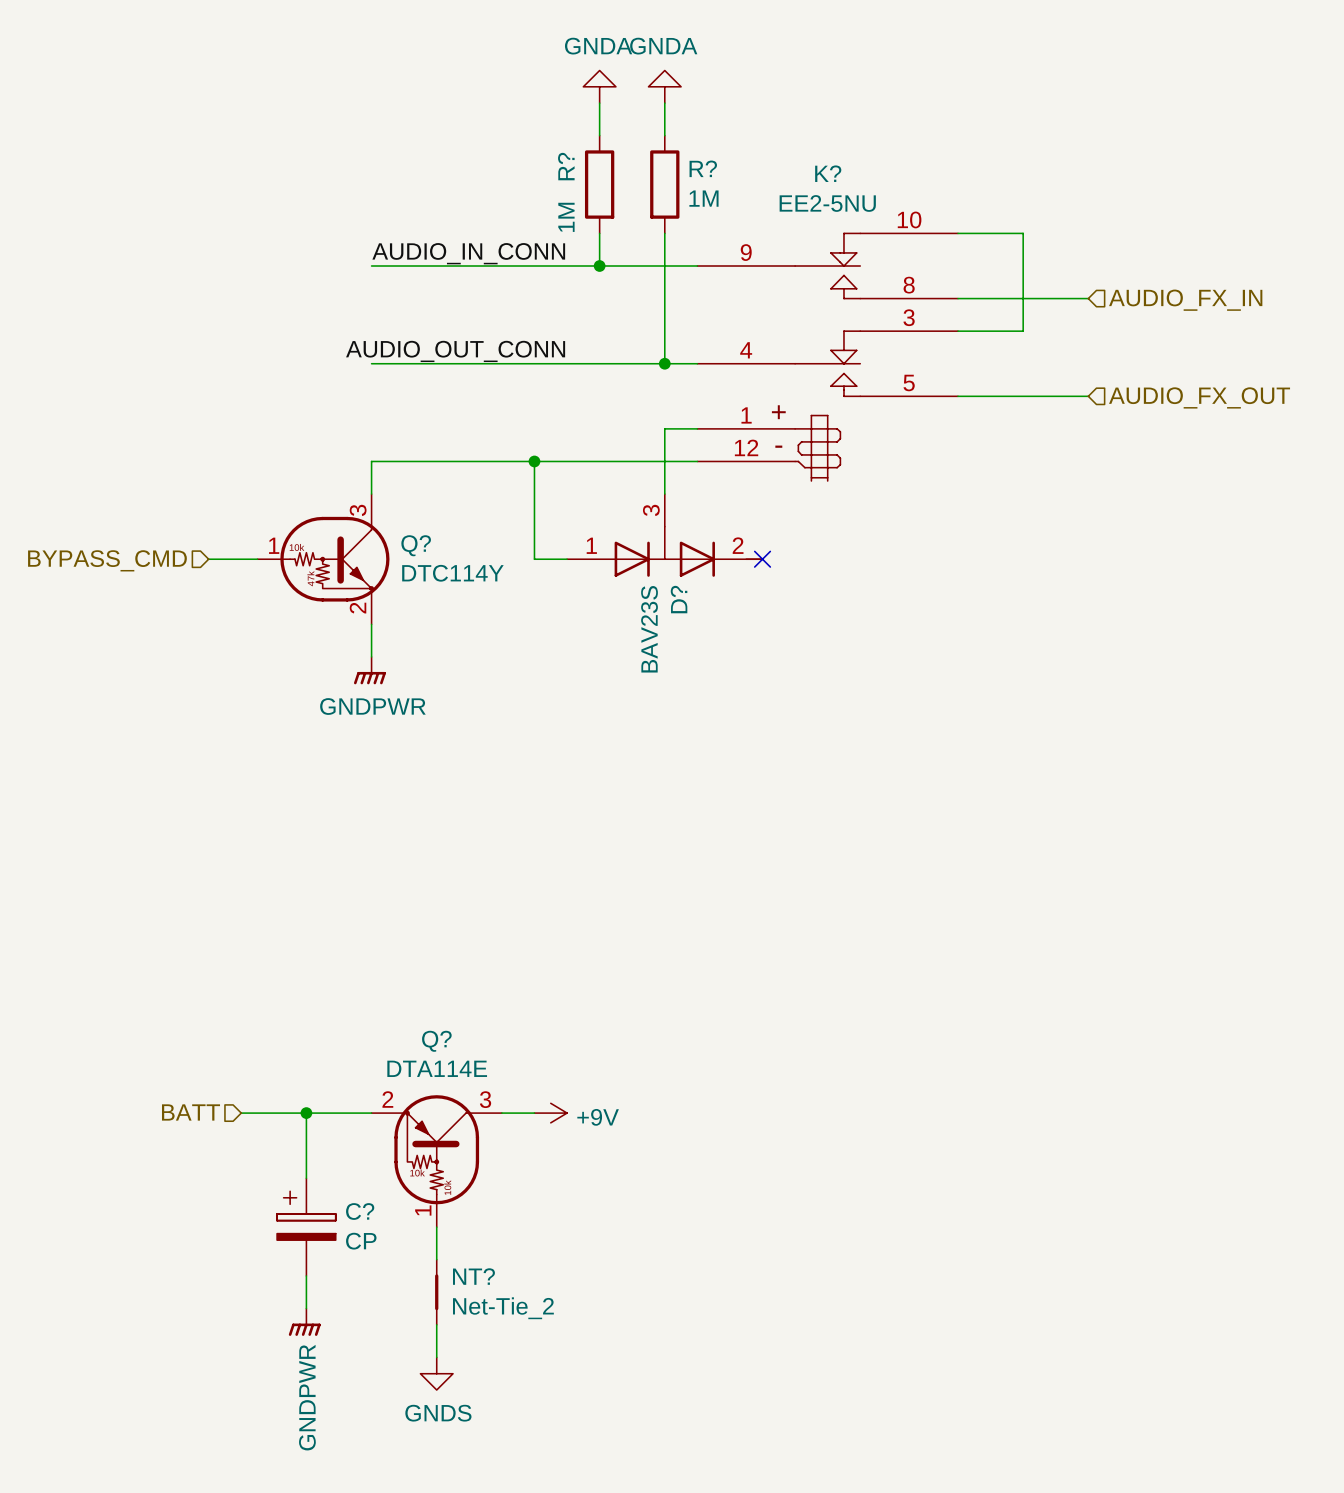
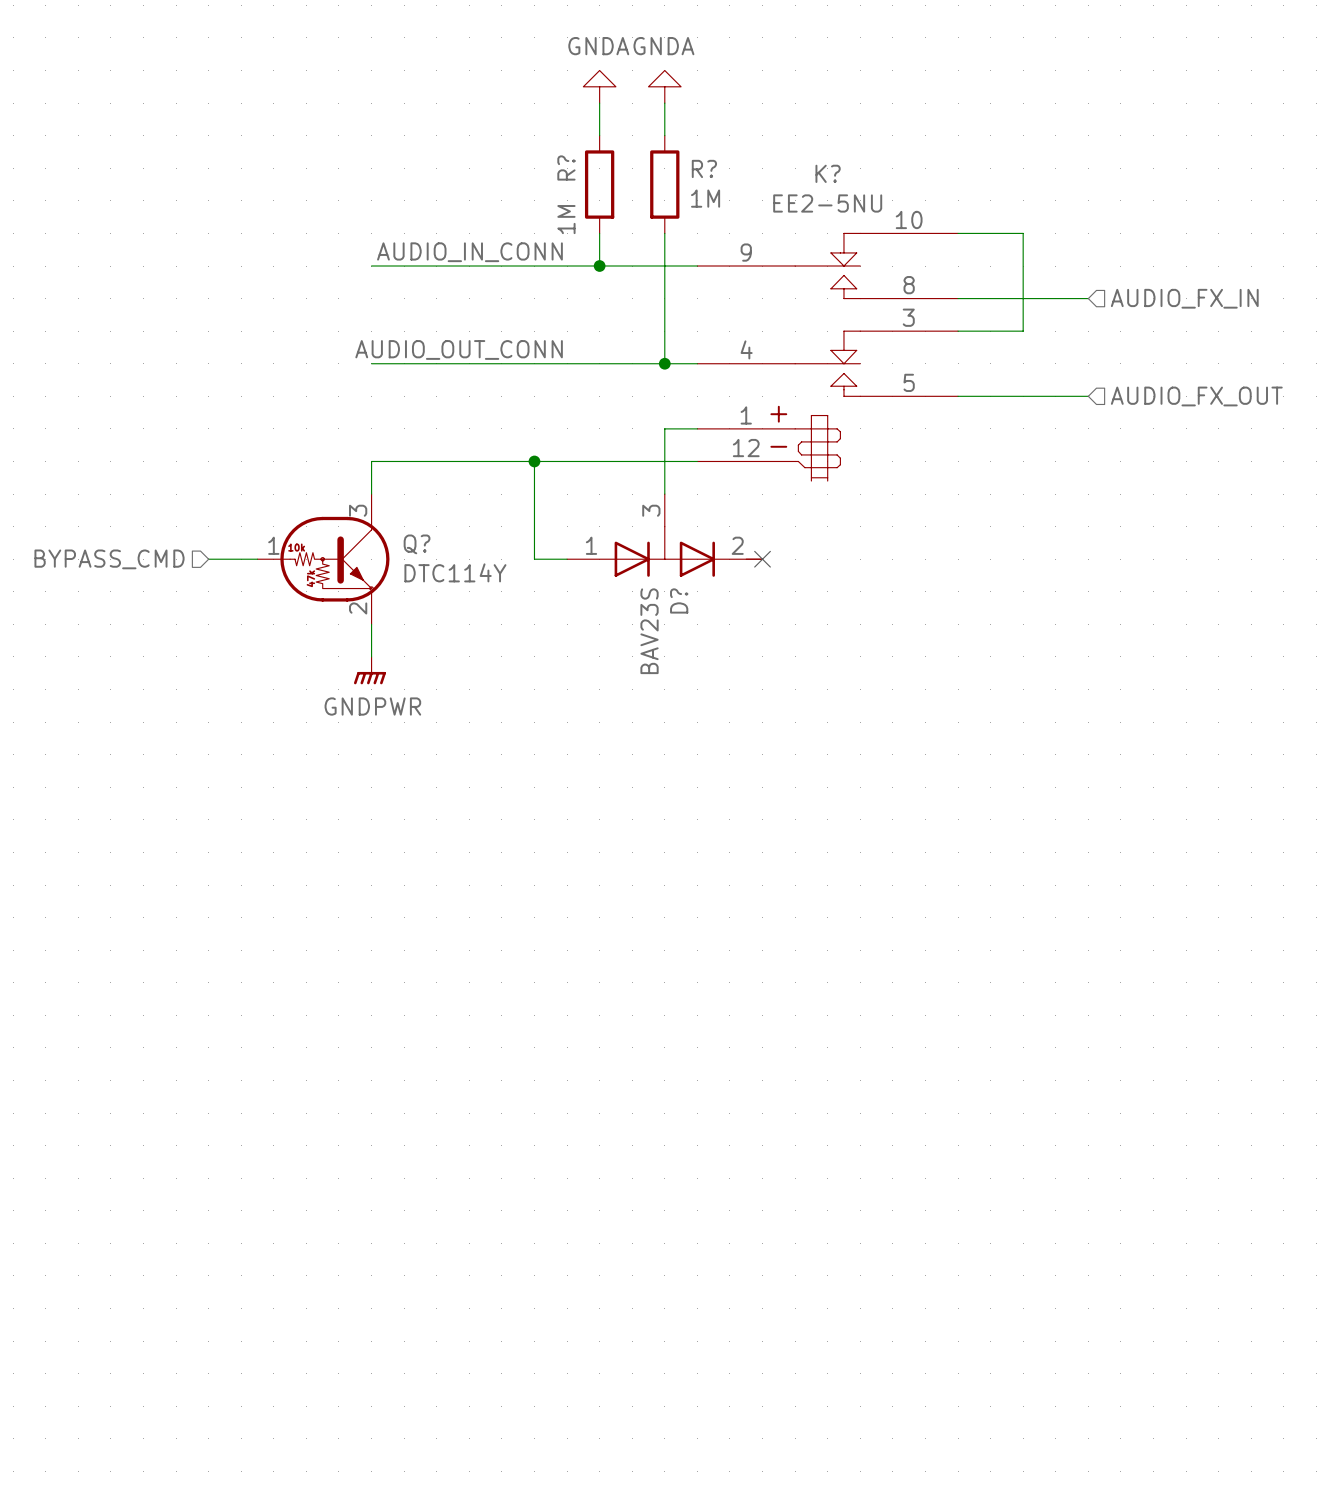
hierarchical label: BATT (191, 1112) -> none
wire: (241, 1113) (371, 1113) -> none
wire: (306, 1113) (306, 1178) -> none
junction: (306, 1113) -> none
wire: (501, 1113) (534, 1113) -> none
power symbol: +9V (550, 1113) -> none
Q?: DTA114E (436, 1161) -> none
C?: CP (306, 1227) -> none
wire: (436, 1227) (436, 1259) -> none
wire: (306, 1275) (306, 1308) -> none
NT?: Net-Tie_2 (436, 1292) -> none
power symbol: GNDPWR (304, 1322) -> none
wire: (436, 1324) (436, 1357) -> none
power symbol: GNDS (436, 1373) -> none

